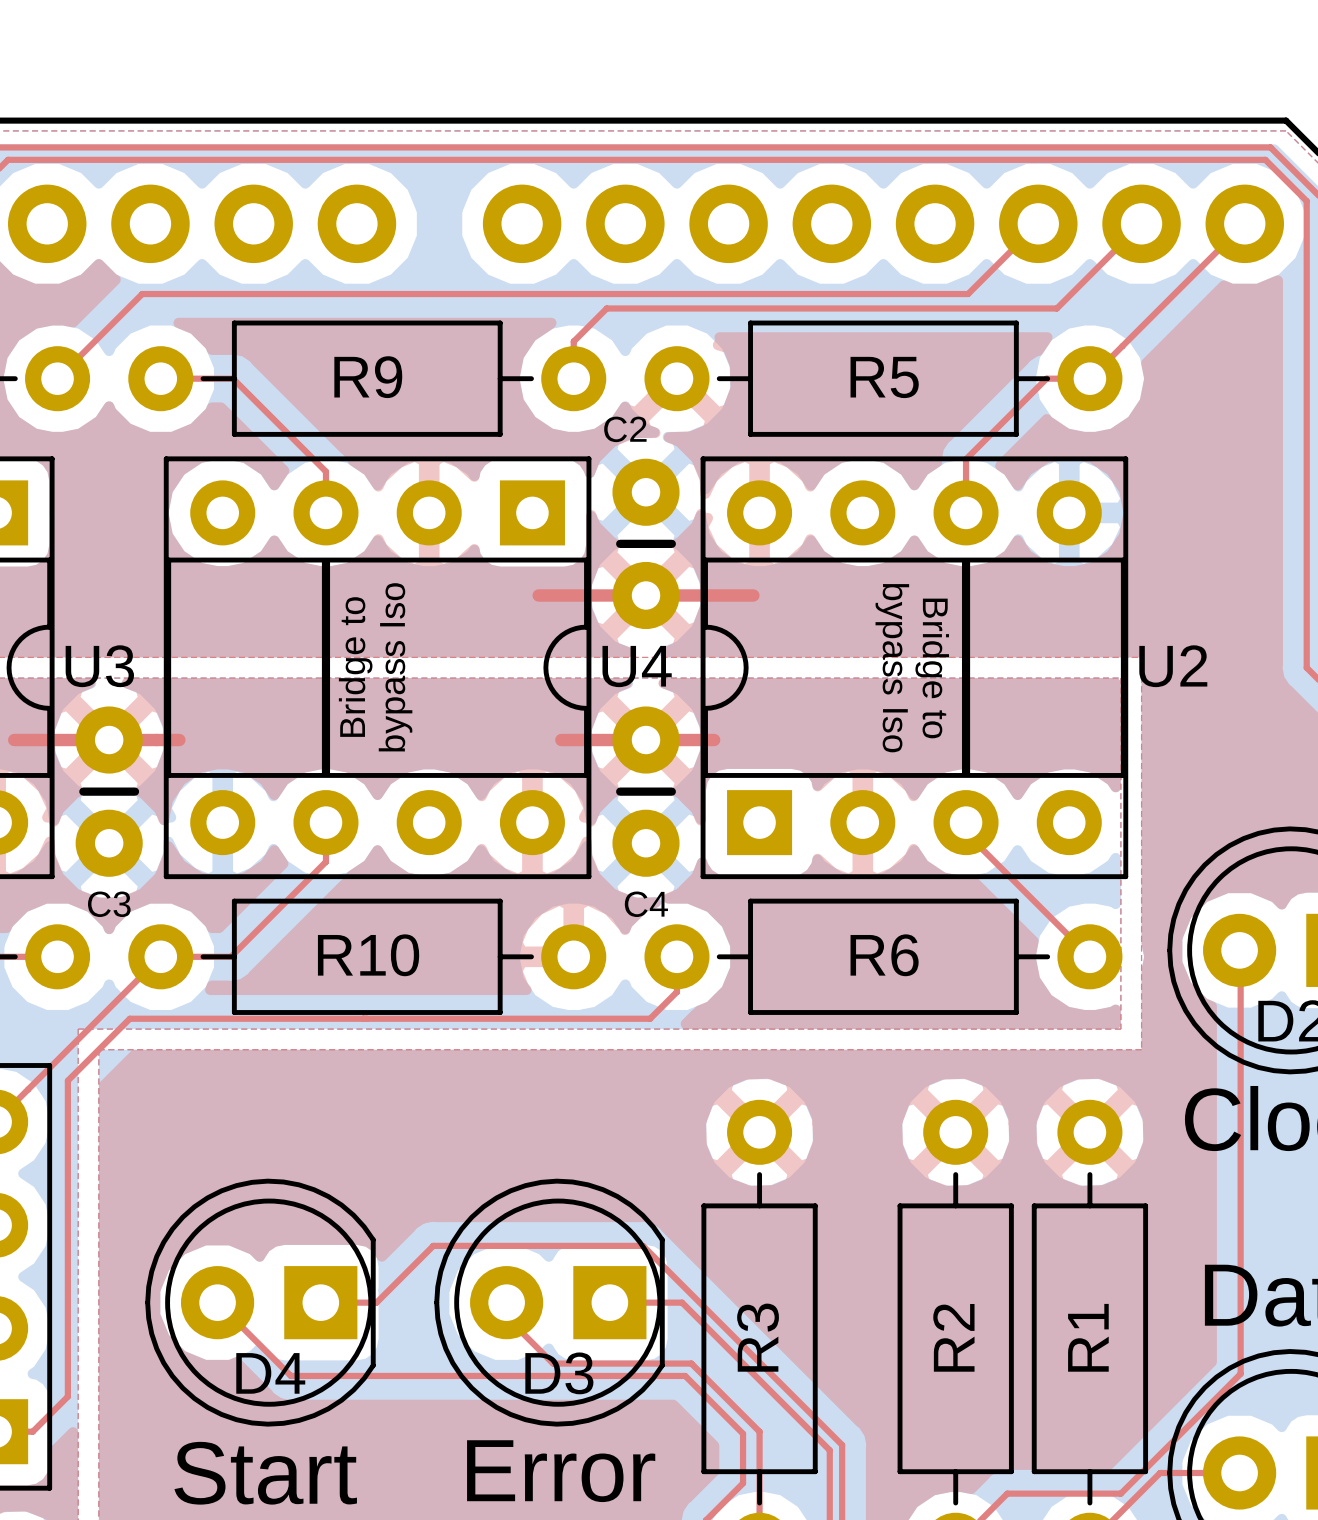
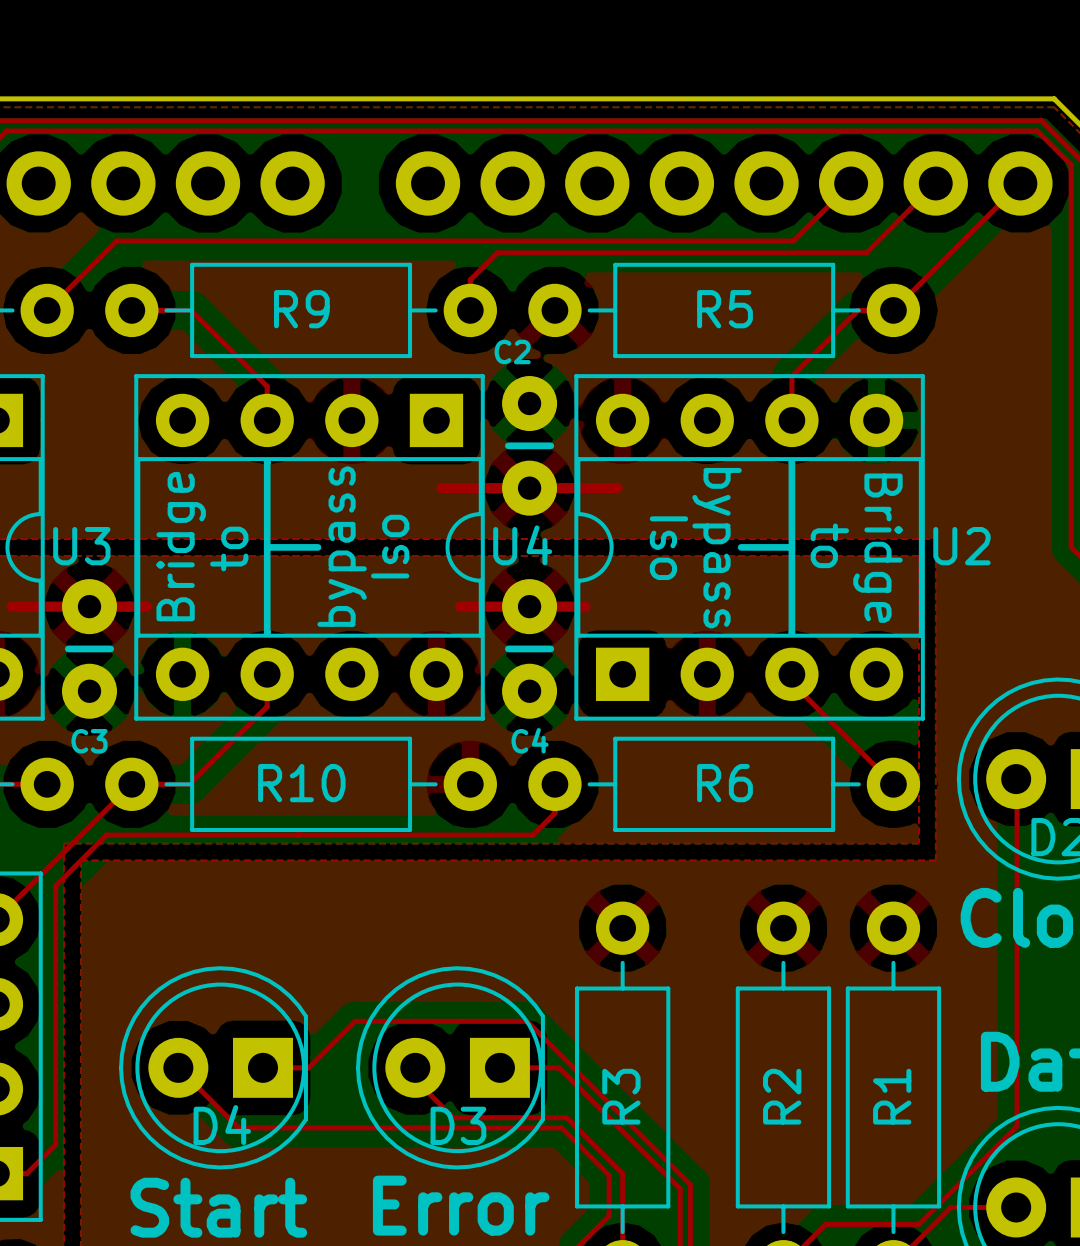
text: none -> Bridge (181, 546)
text: none -> Iso (390, 546)
text: none -> to (829, 545)
line: none -> (267, 547) (317, 547)
text: Bridge to (355, 667) -> none
text: bypass Iso (395, 667) -> bypass (342, 546)
line: none -> (741, 547) (791, 547)
text: none -> to (229, 548)
text: bypass Iso (892, 668) -> bypass (717, 548)
text: Bridge to (932, 668) -> none
text: none -> Bridge (877, 548)
text: none -> Iso (668, 548)

